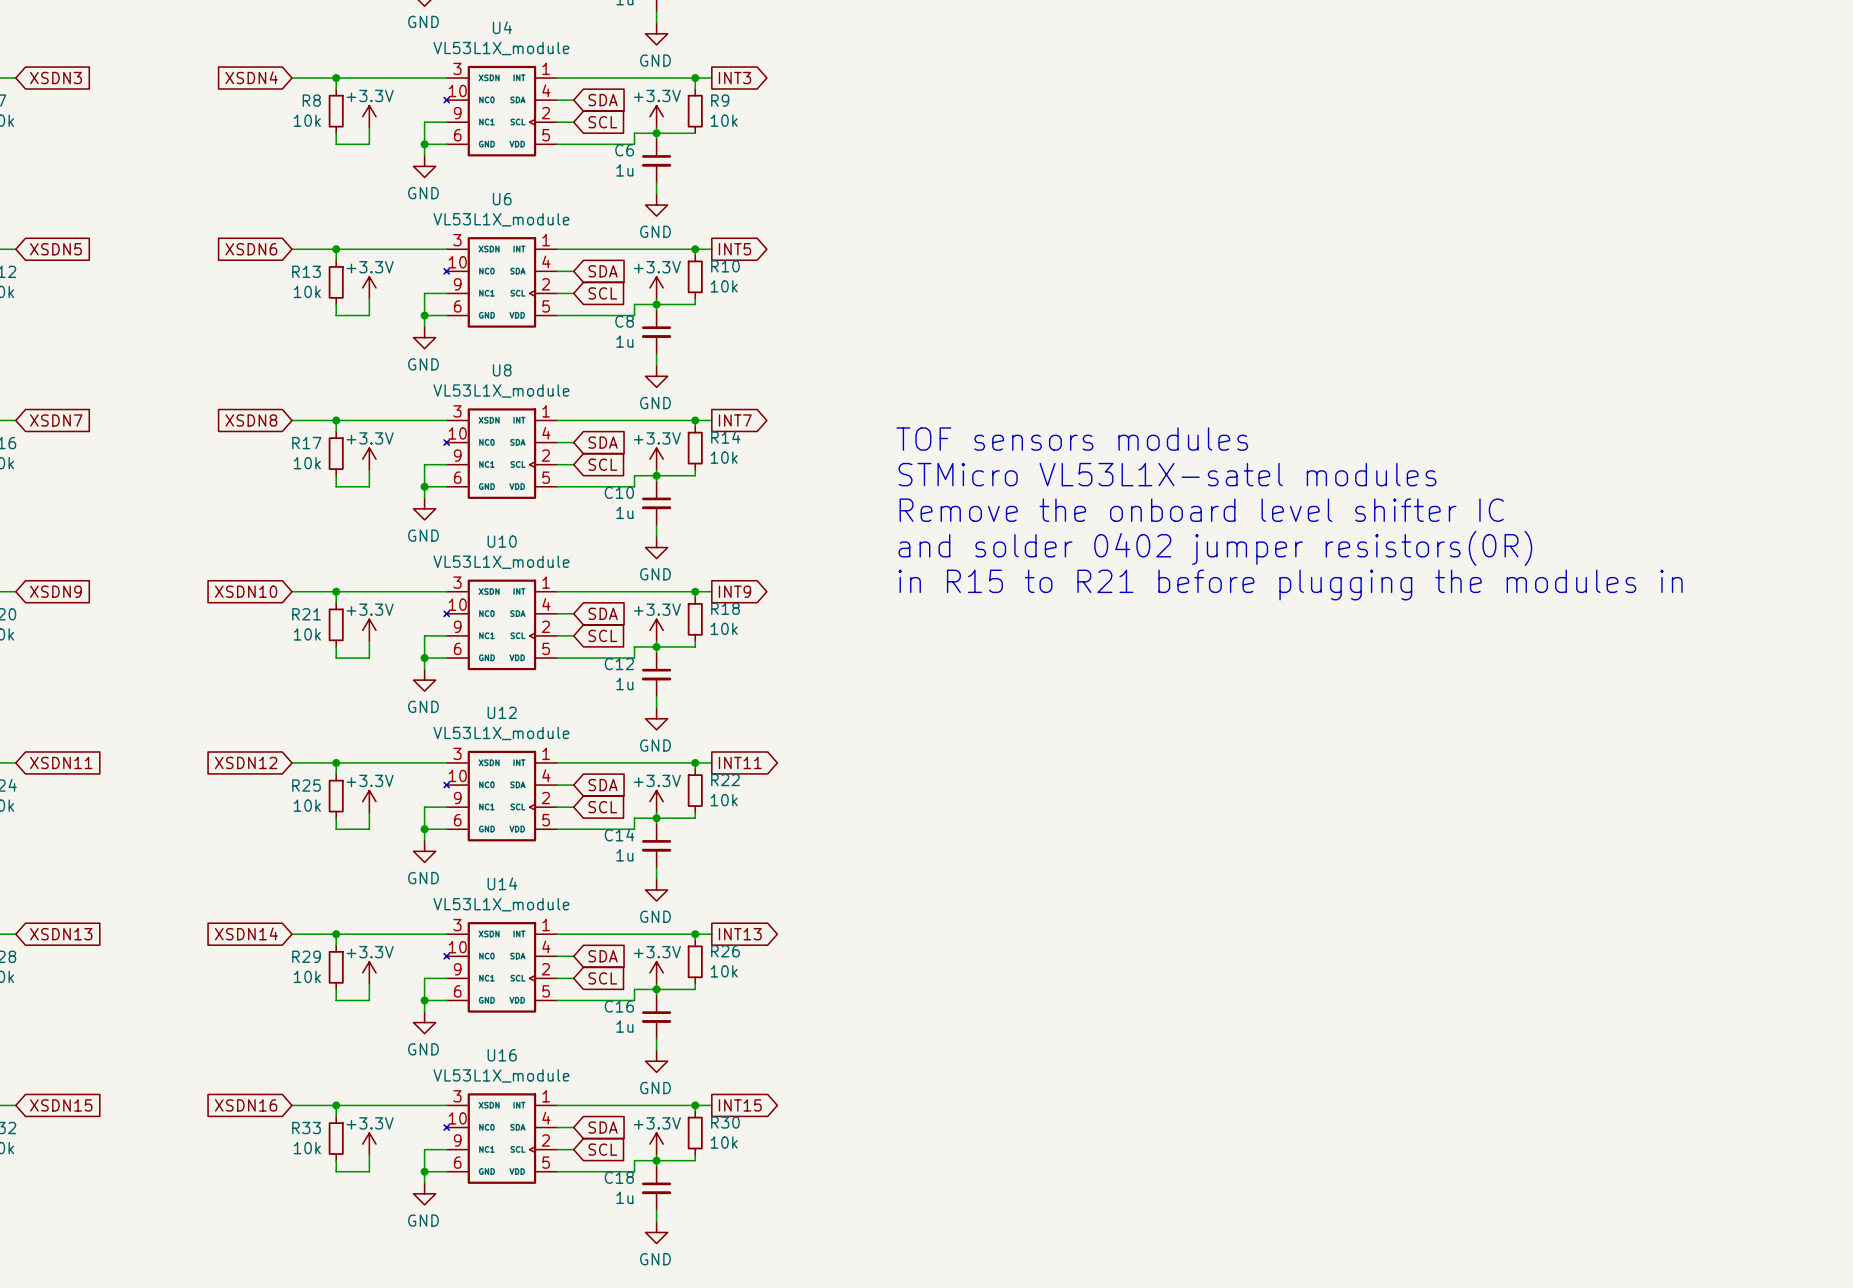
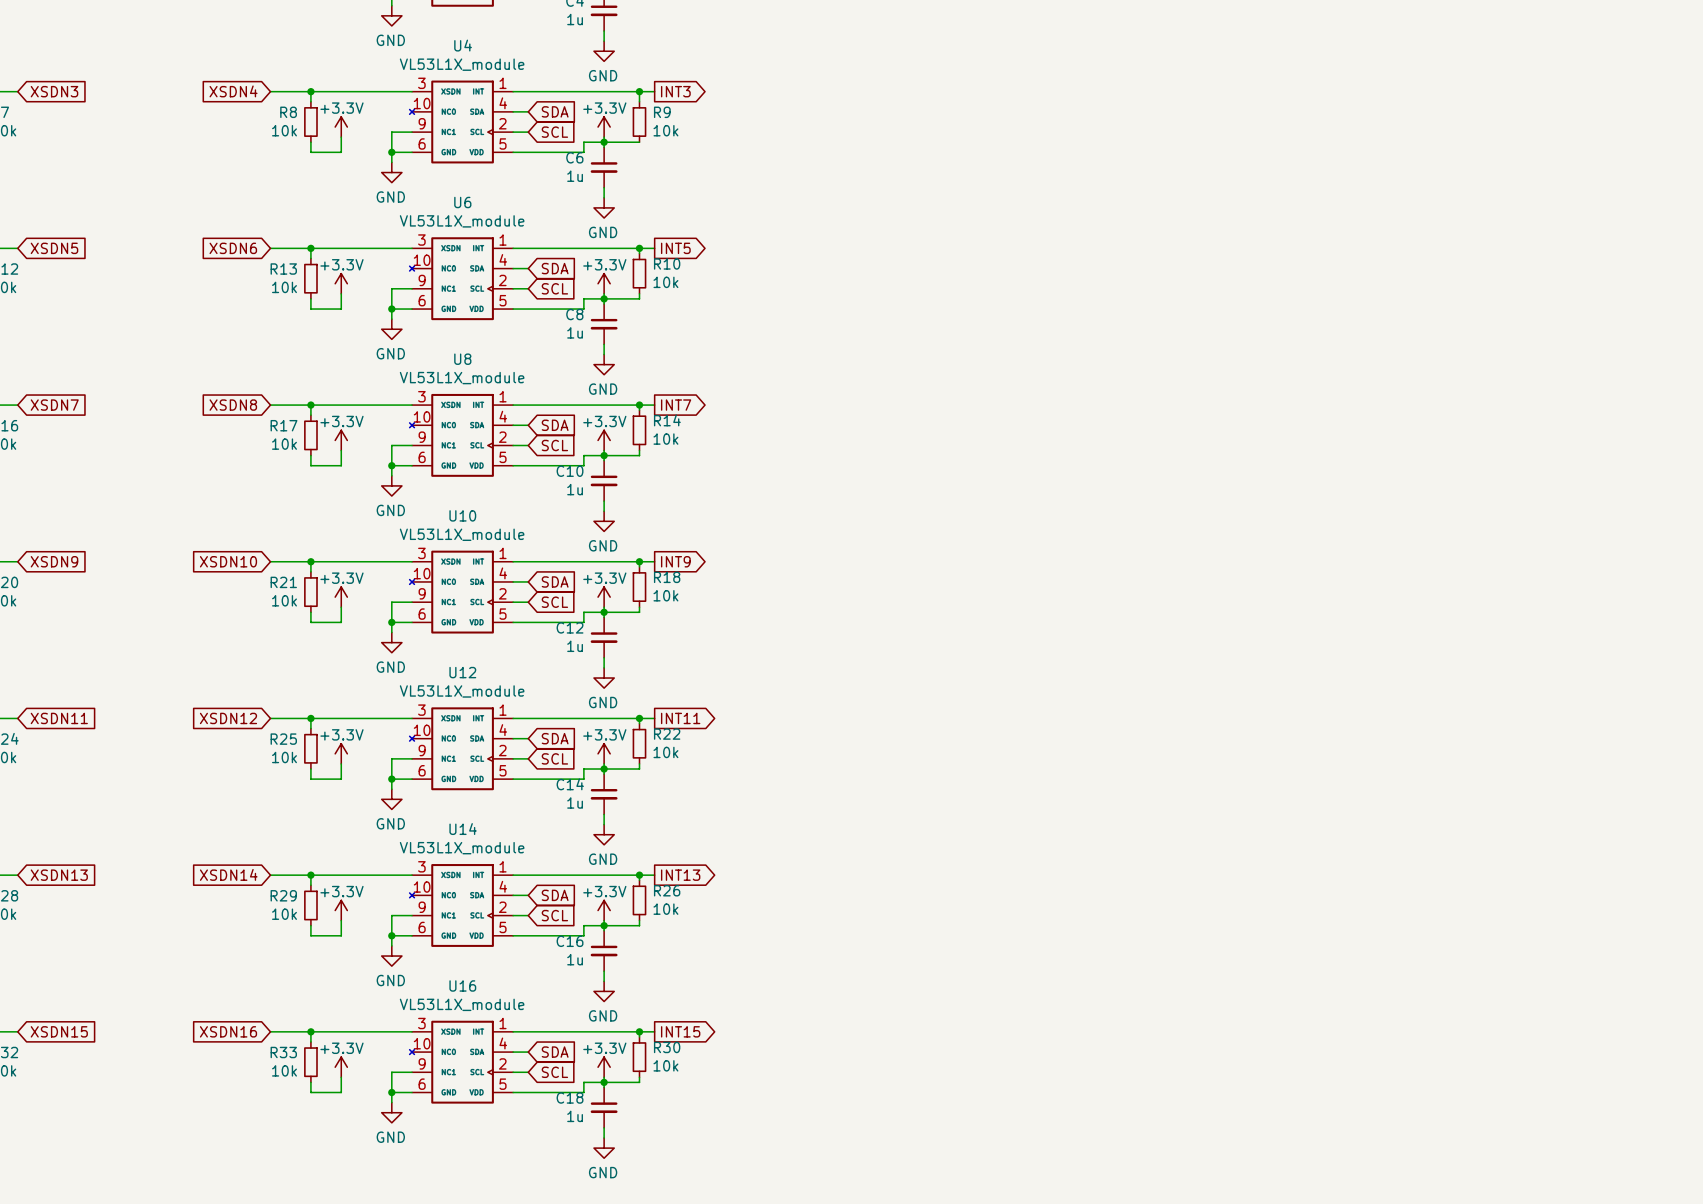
text: TOF sensors modules (1072, 439) -> none
text: STMicro VL53L1X-satel modules (1167, 474) -> none
text: Remove the onboard level shifter IC (1201, 510) -> none
text: and solder 0402 jumper resistors(0R) (1215, 548) -> none
text: in R15 to R21 before plugging the modules in (1290, 585) -> none

